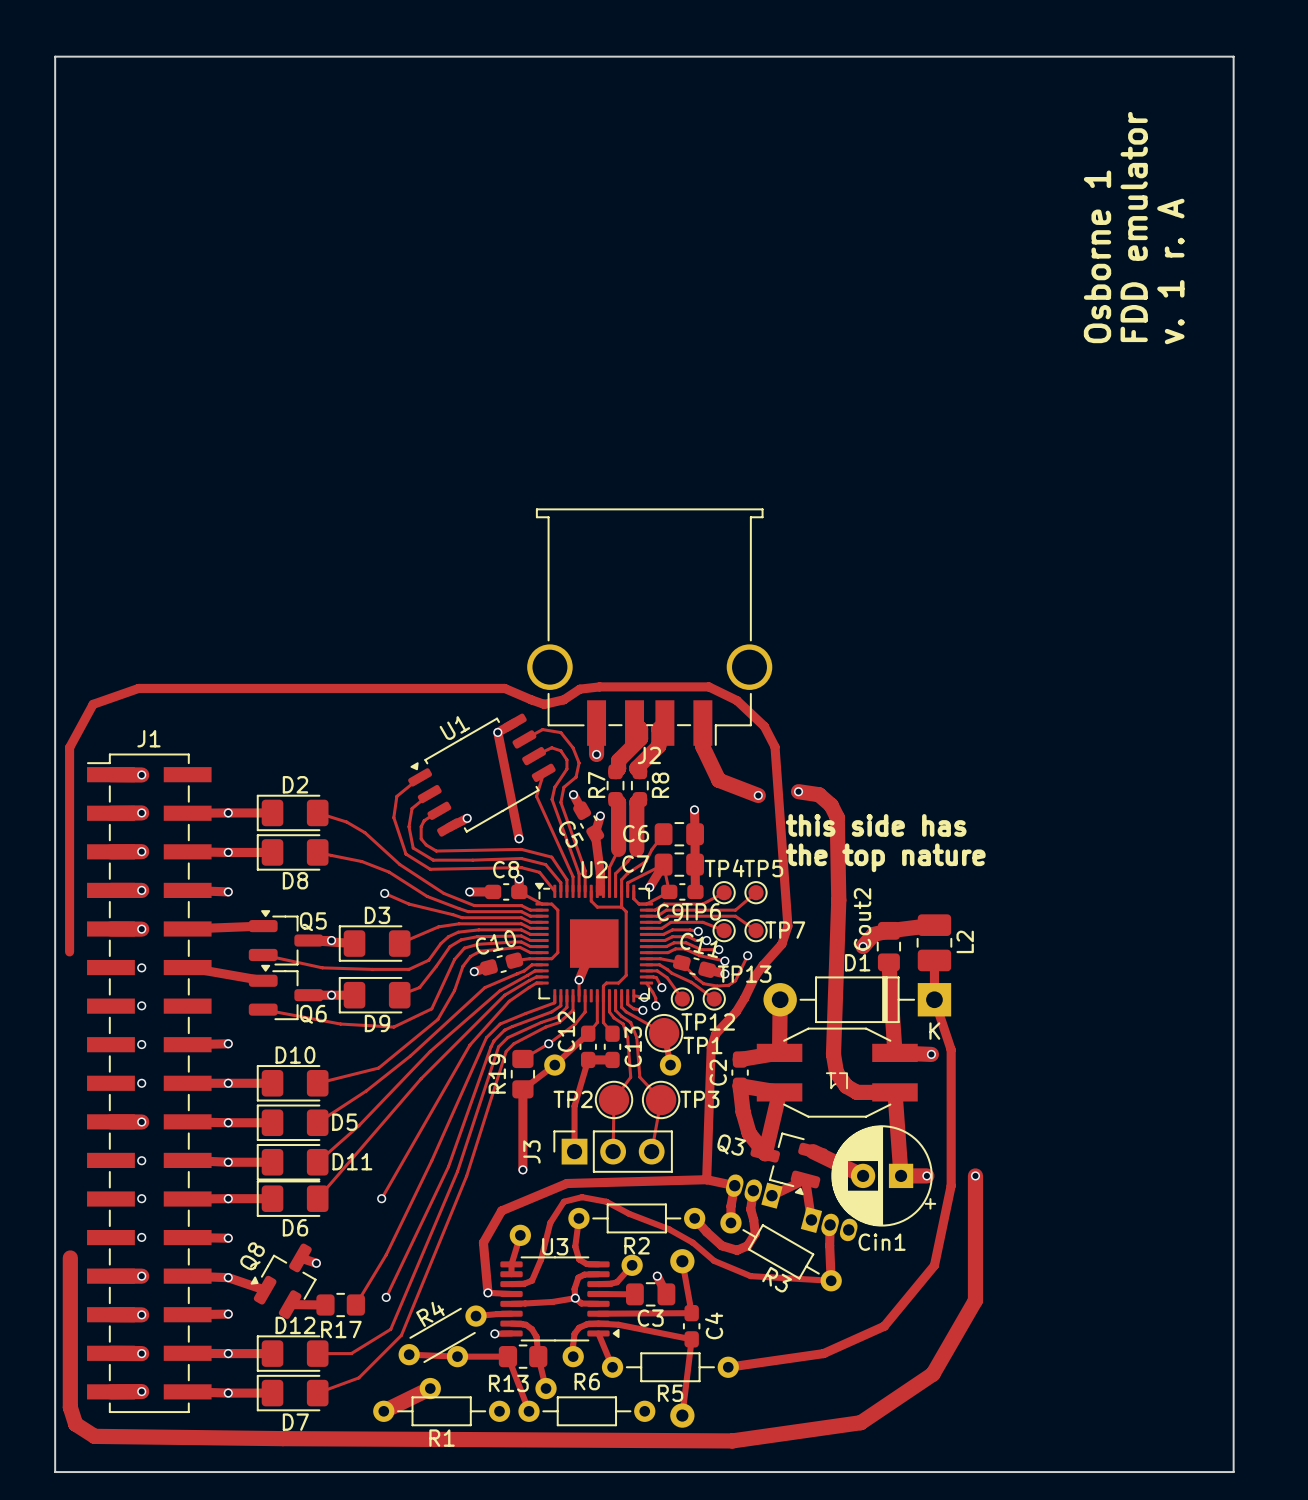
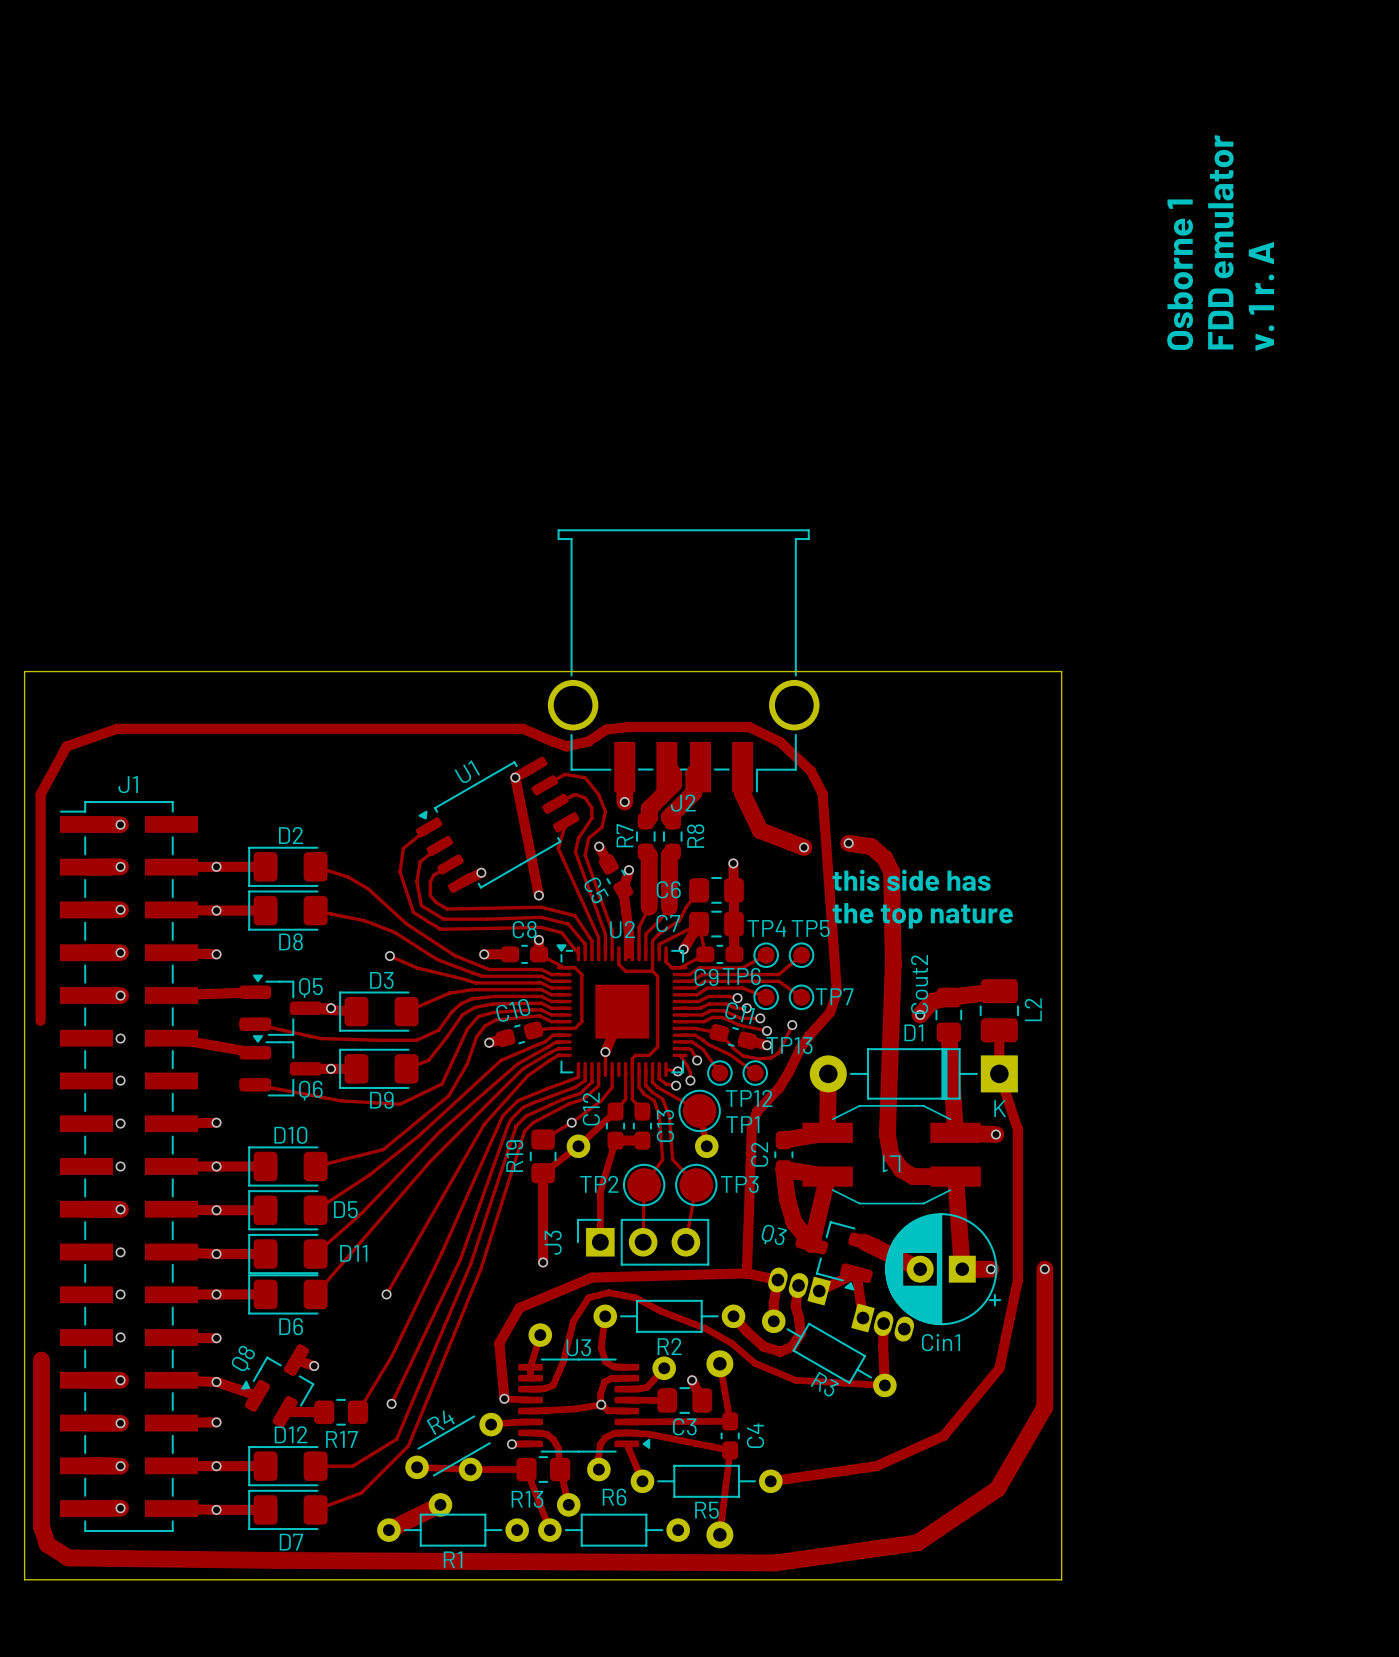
board edge: (55, 636) (55, 56) (1233, 56) (1233, 1472) (55, 1472) (55, 1456) -> (24, 671) (1061, 671) (1061, 1579) (24, 1579)

